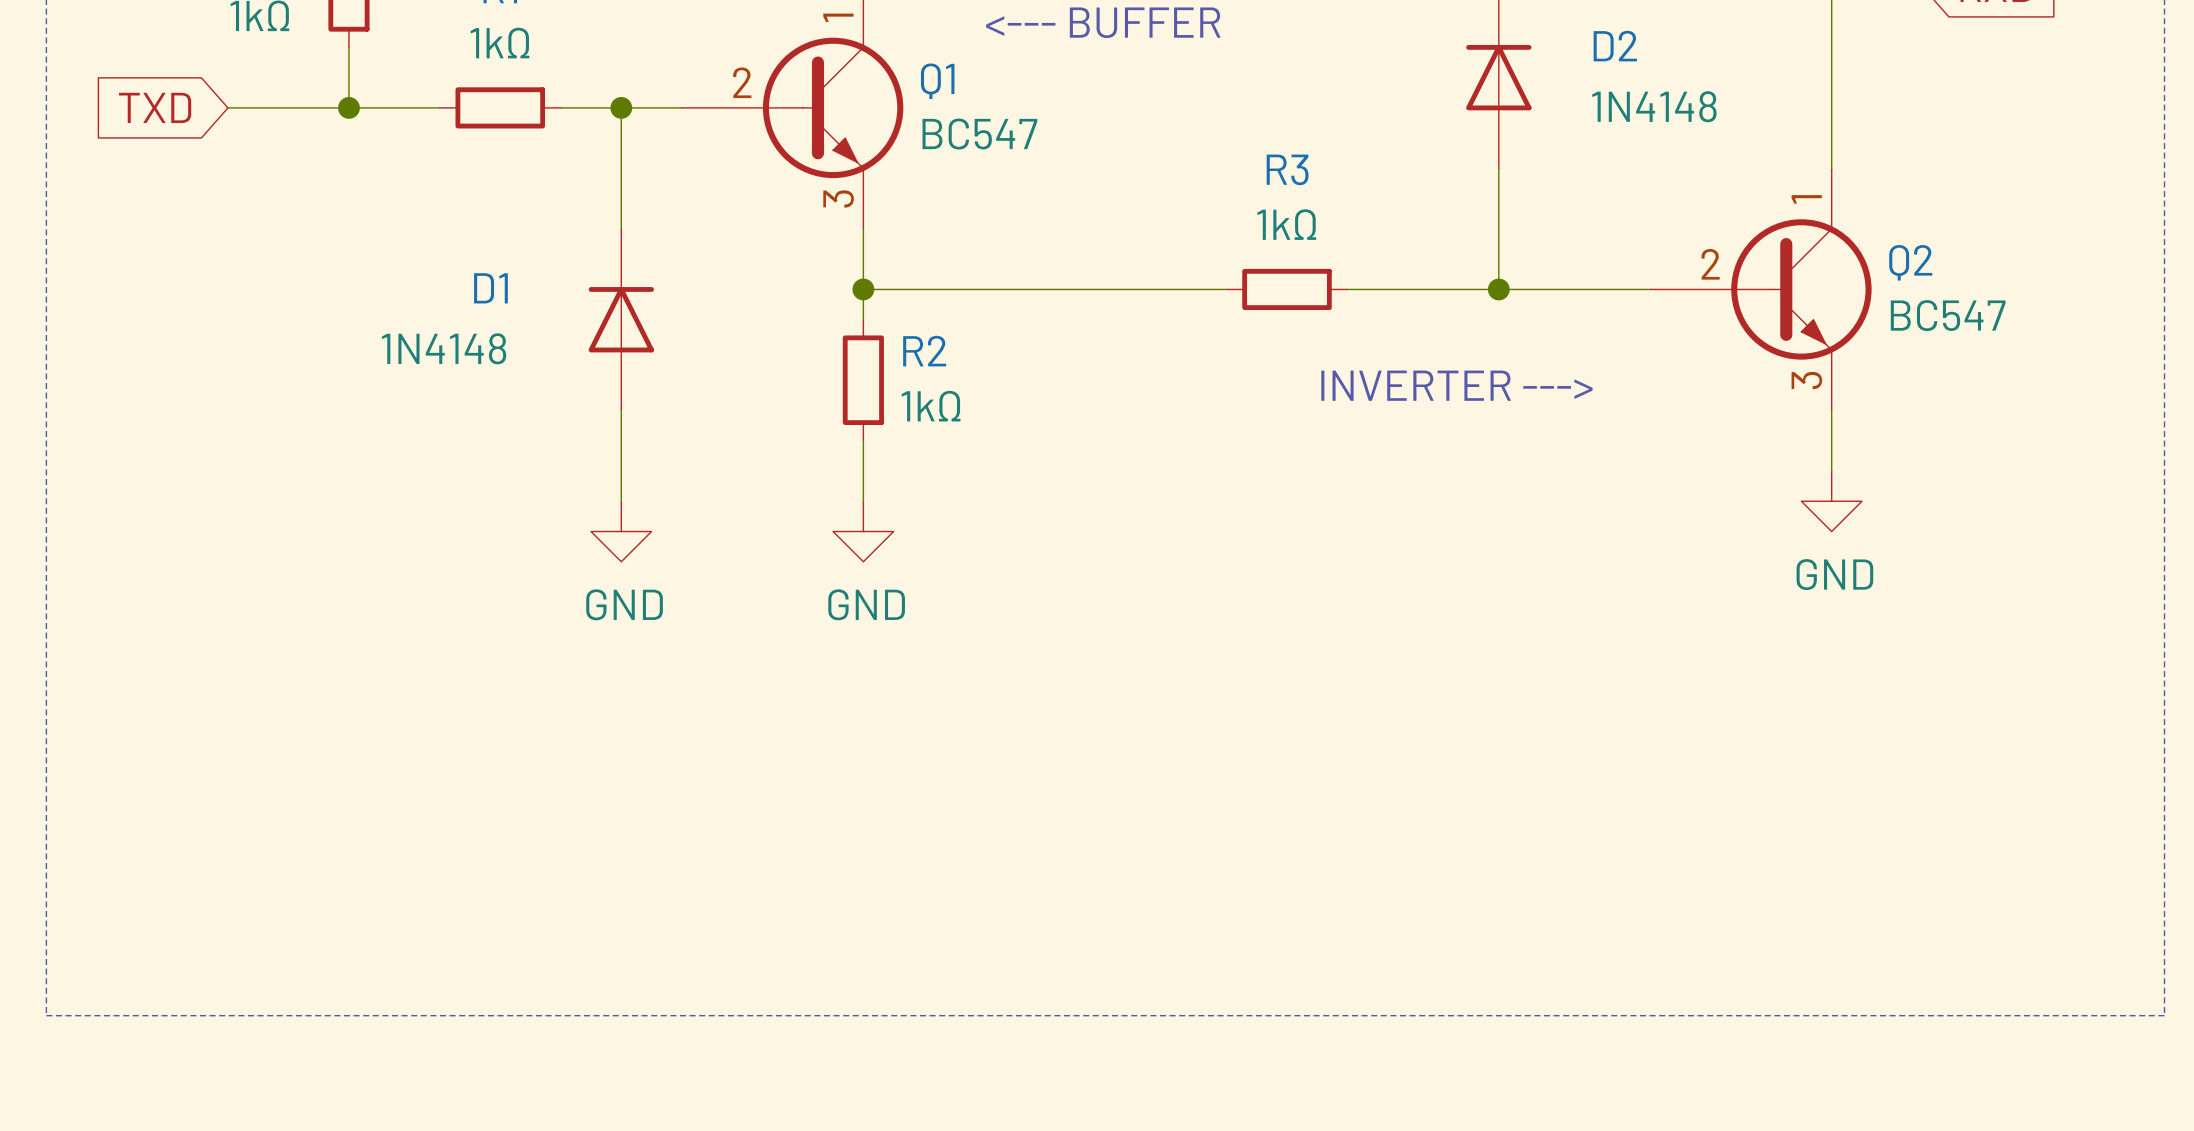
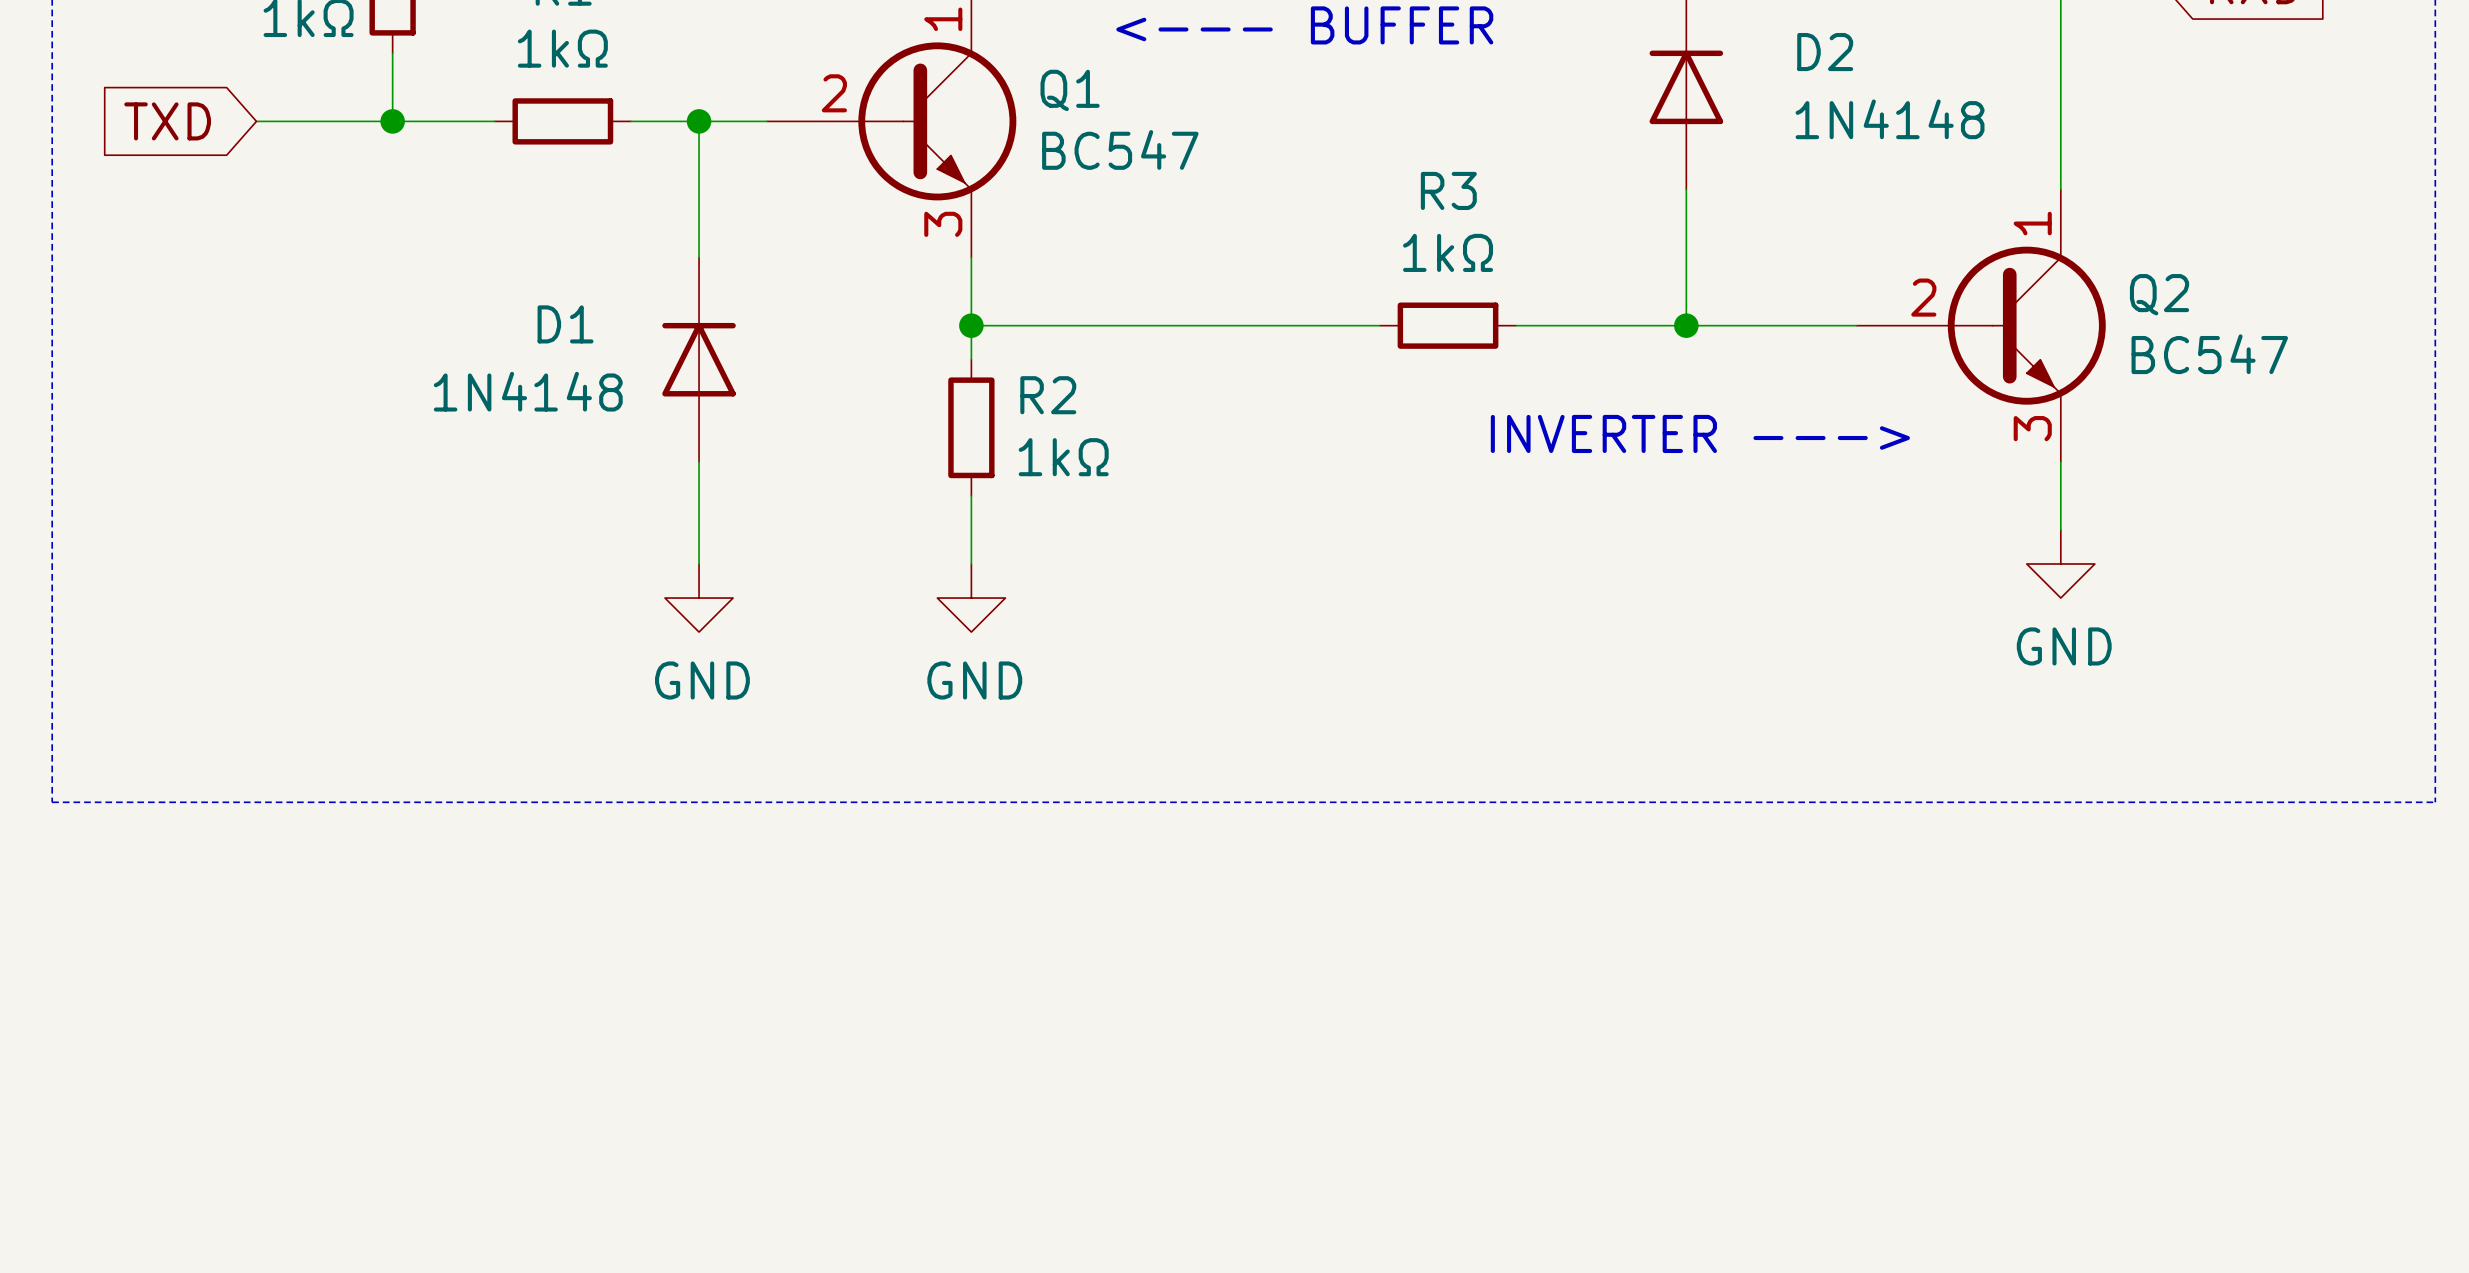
line: (46, 713) (46, 1015) (2164, 1015) (2164, 713) -> (52, 802) (2435, 802)

